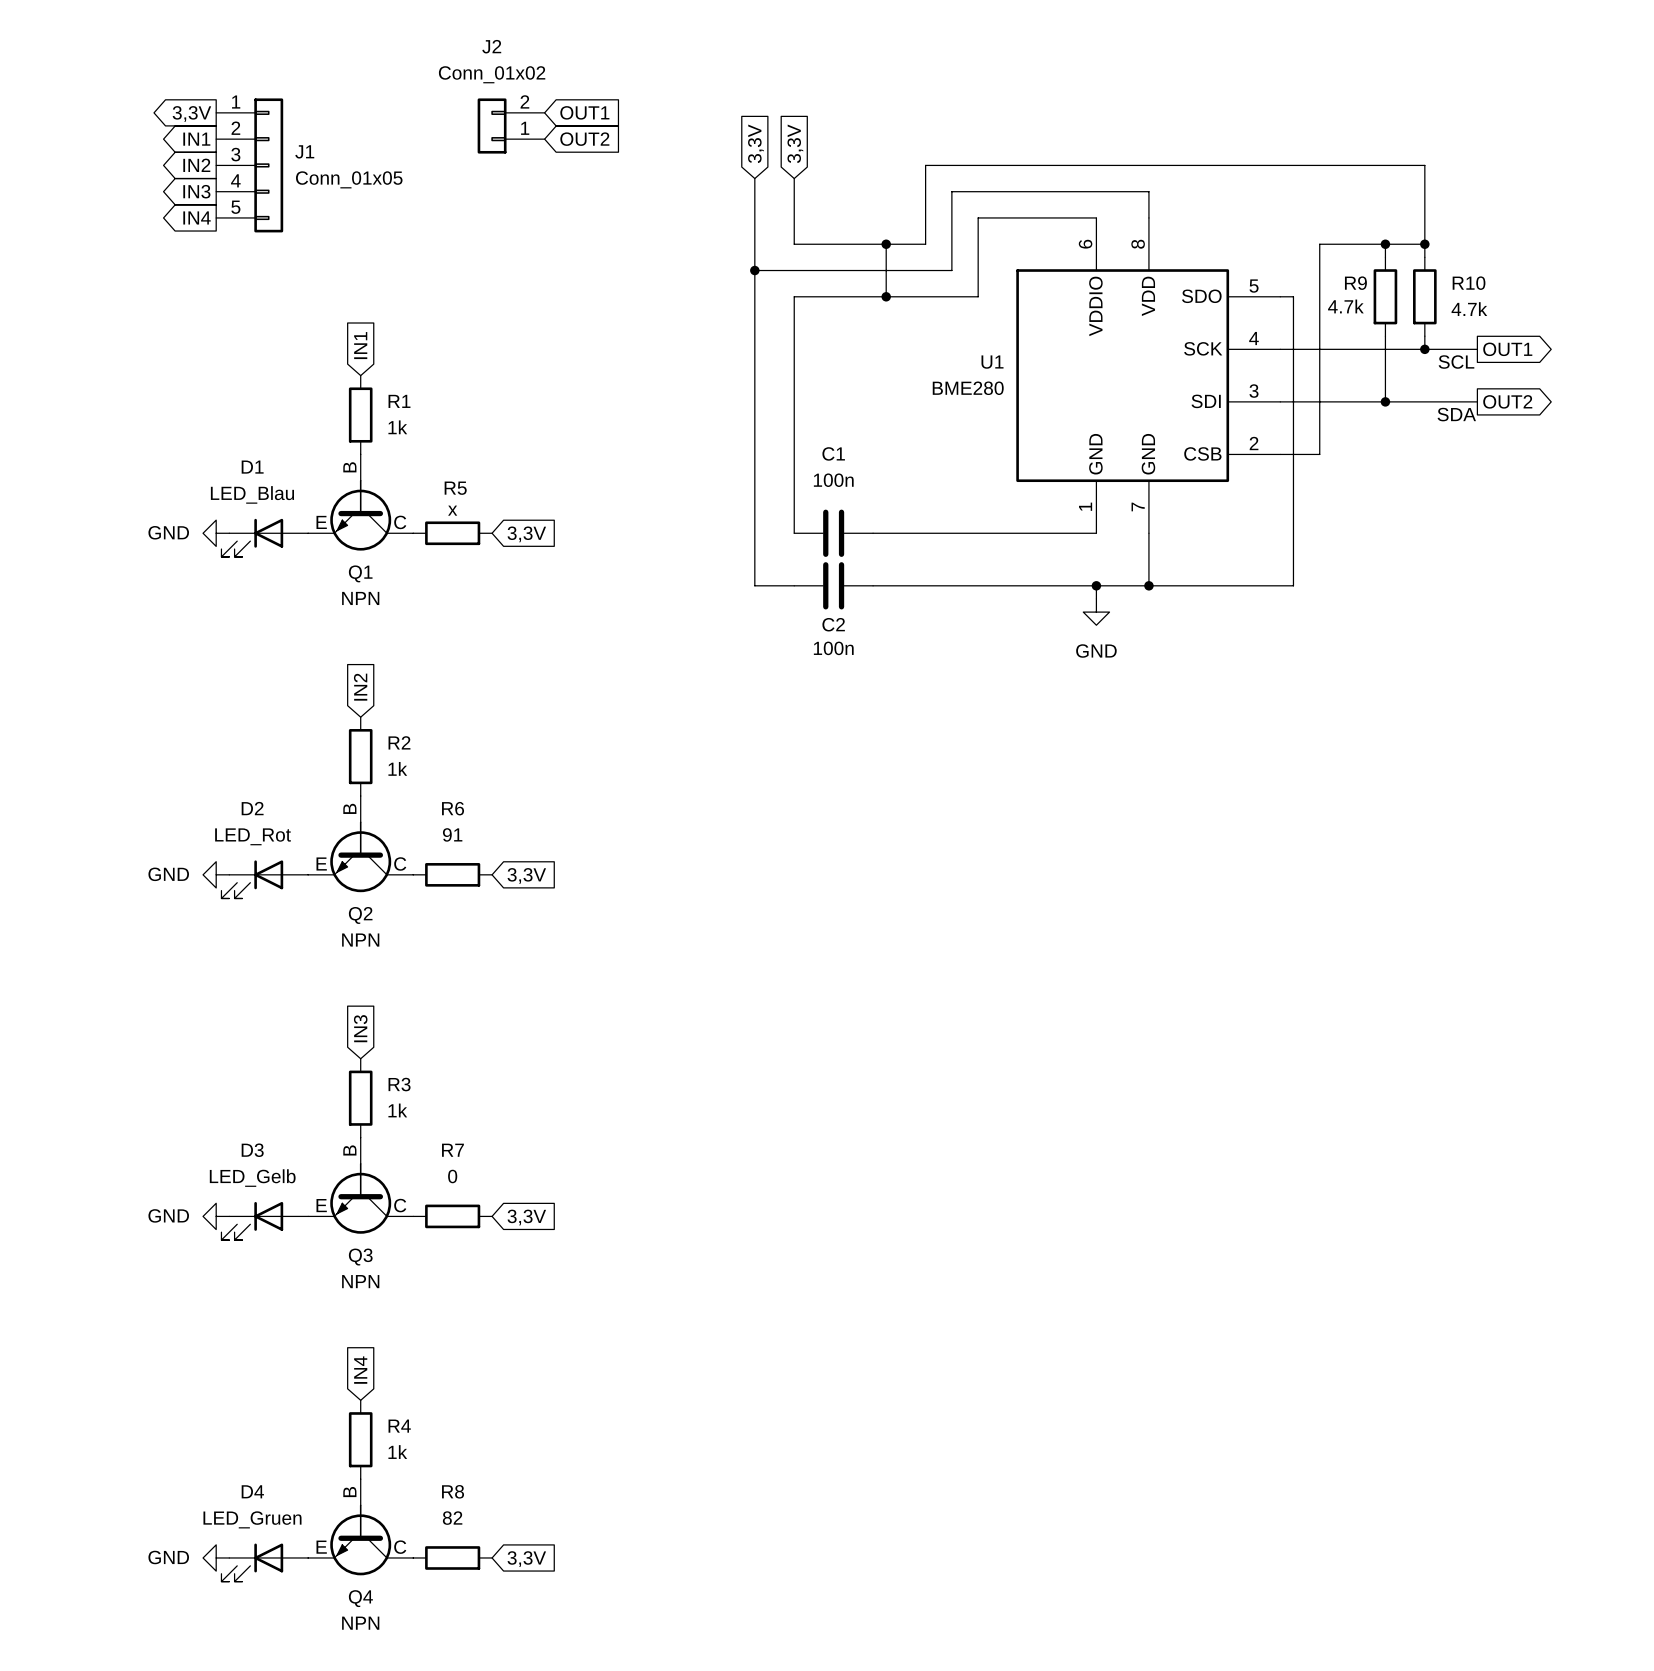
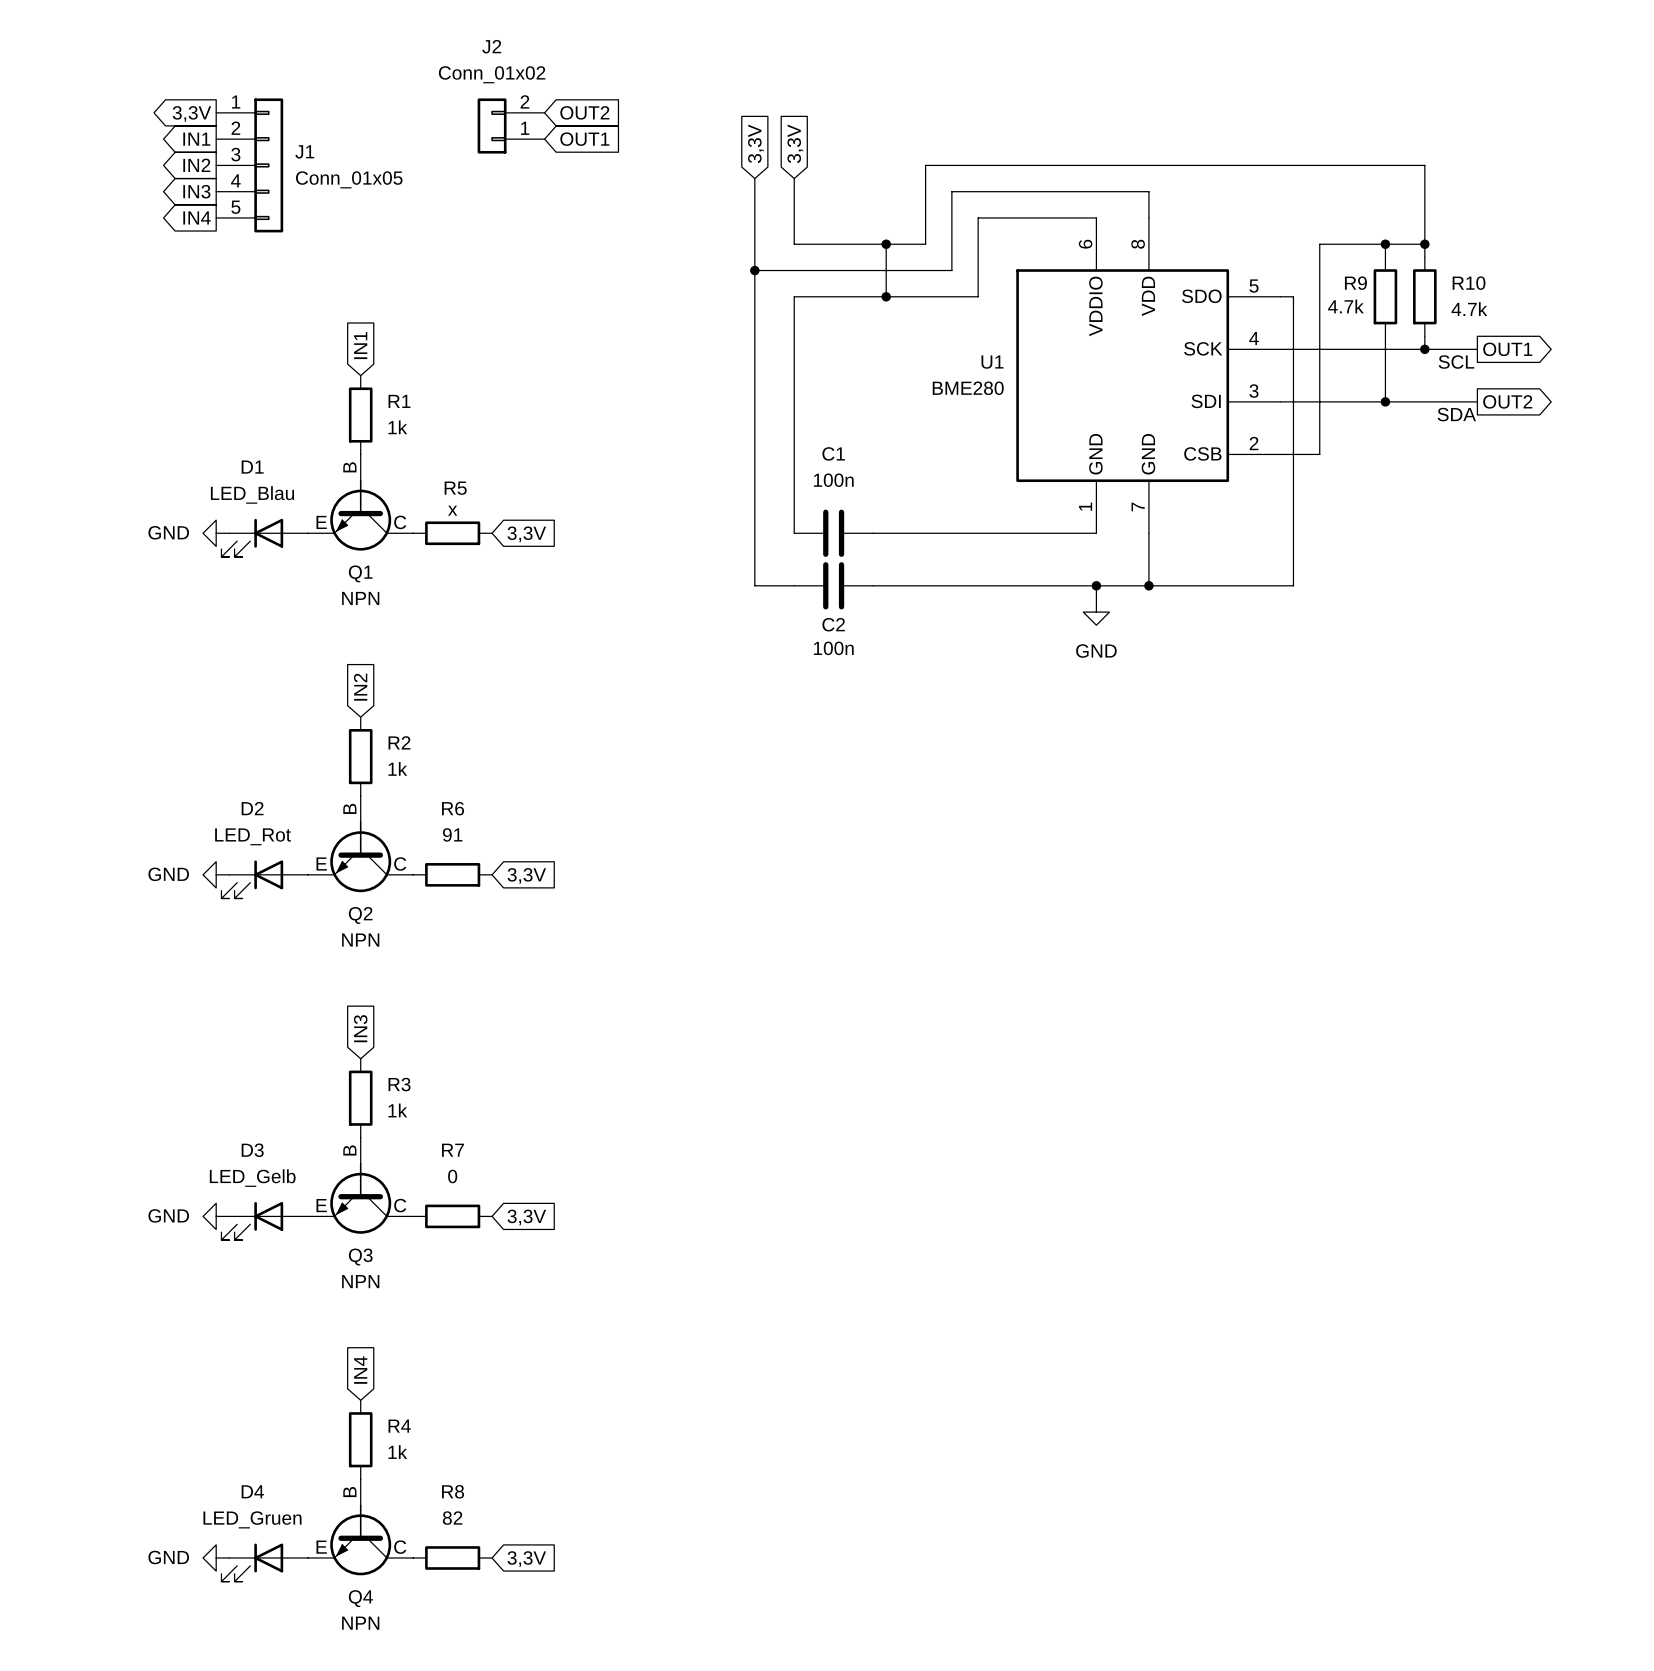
global label: OUT1 (584, 112) -> OUT2 (584, 112)
global label: OUT2 (584, 139) -> OUT1 (584, 139)

